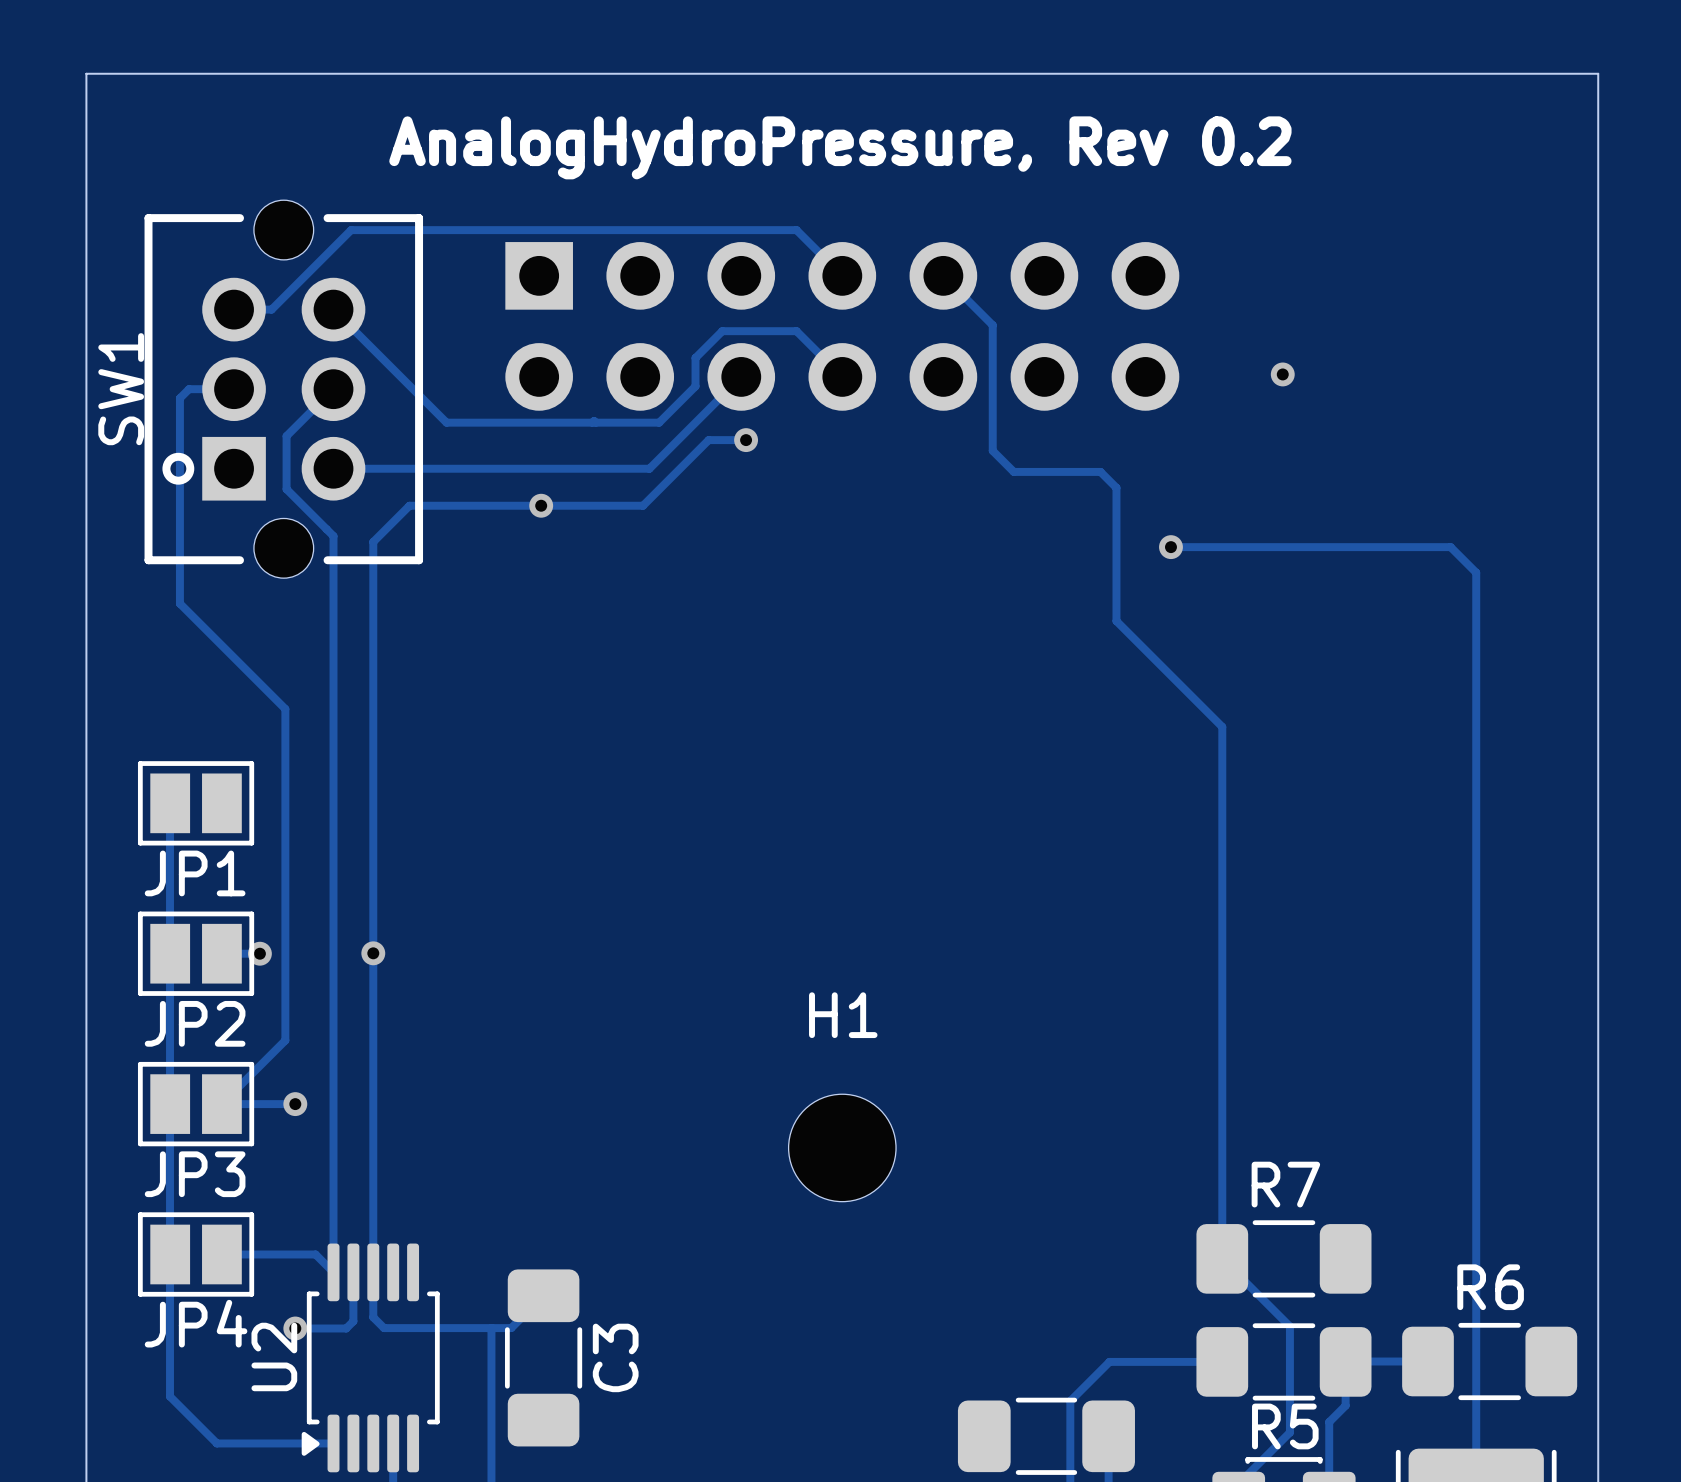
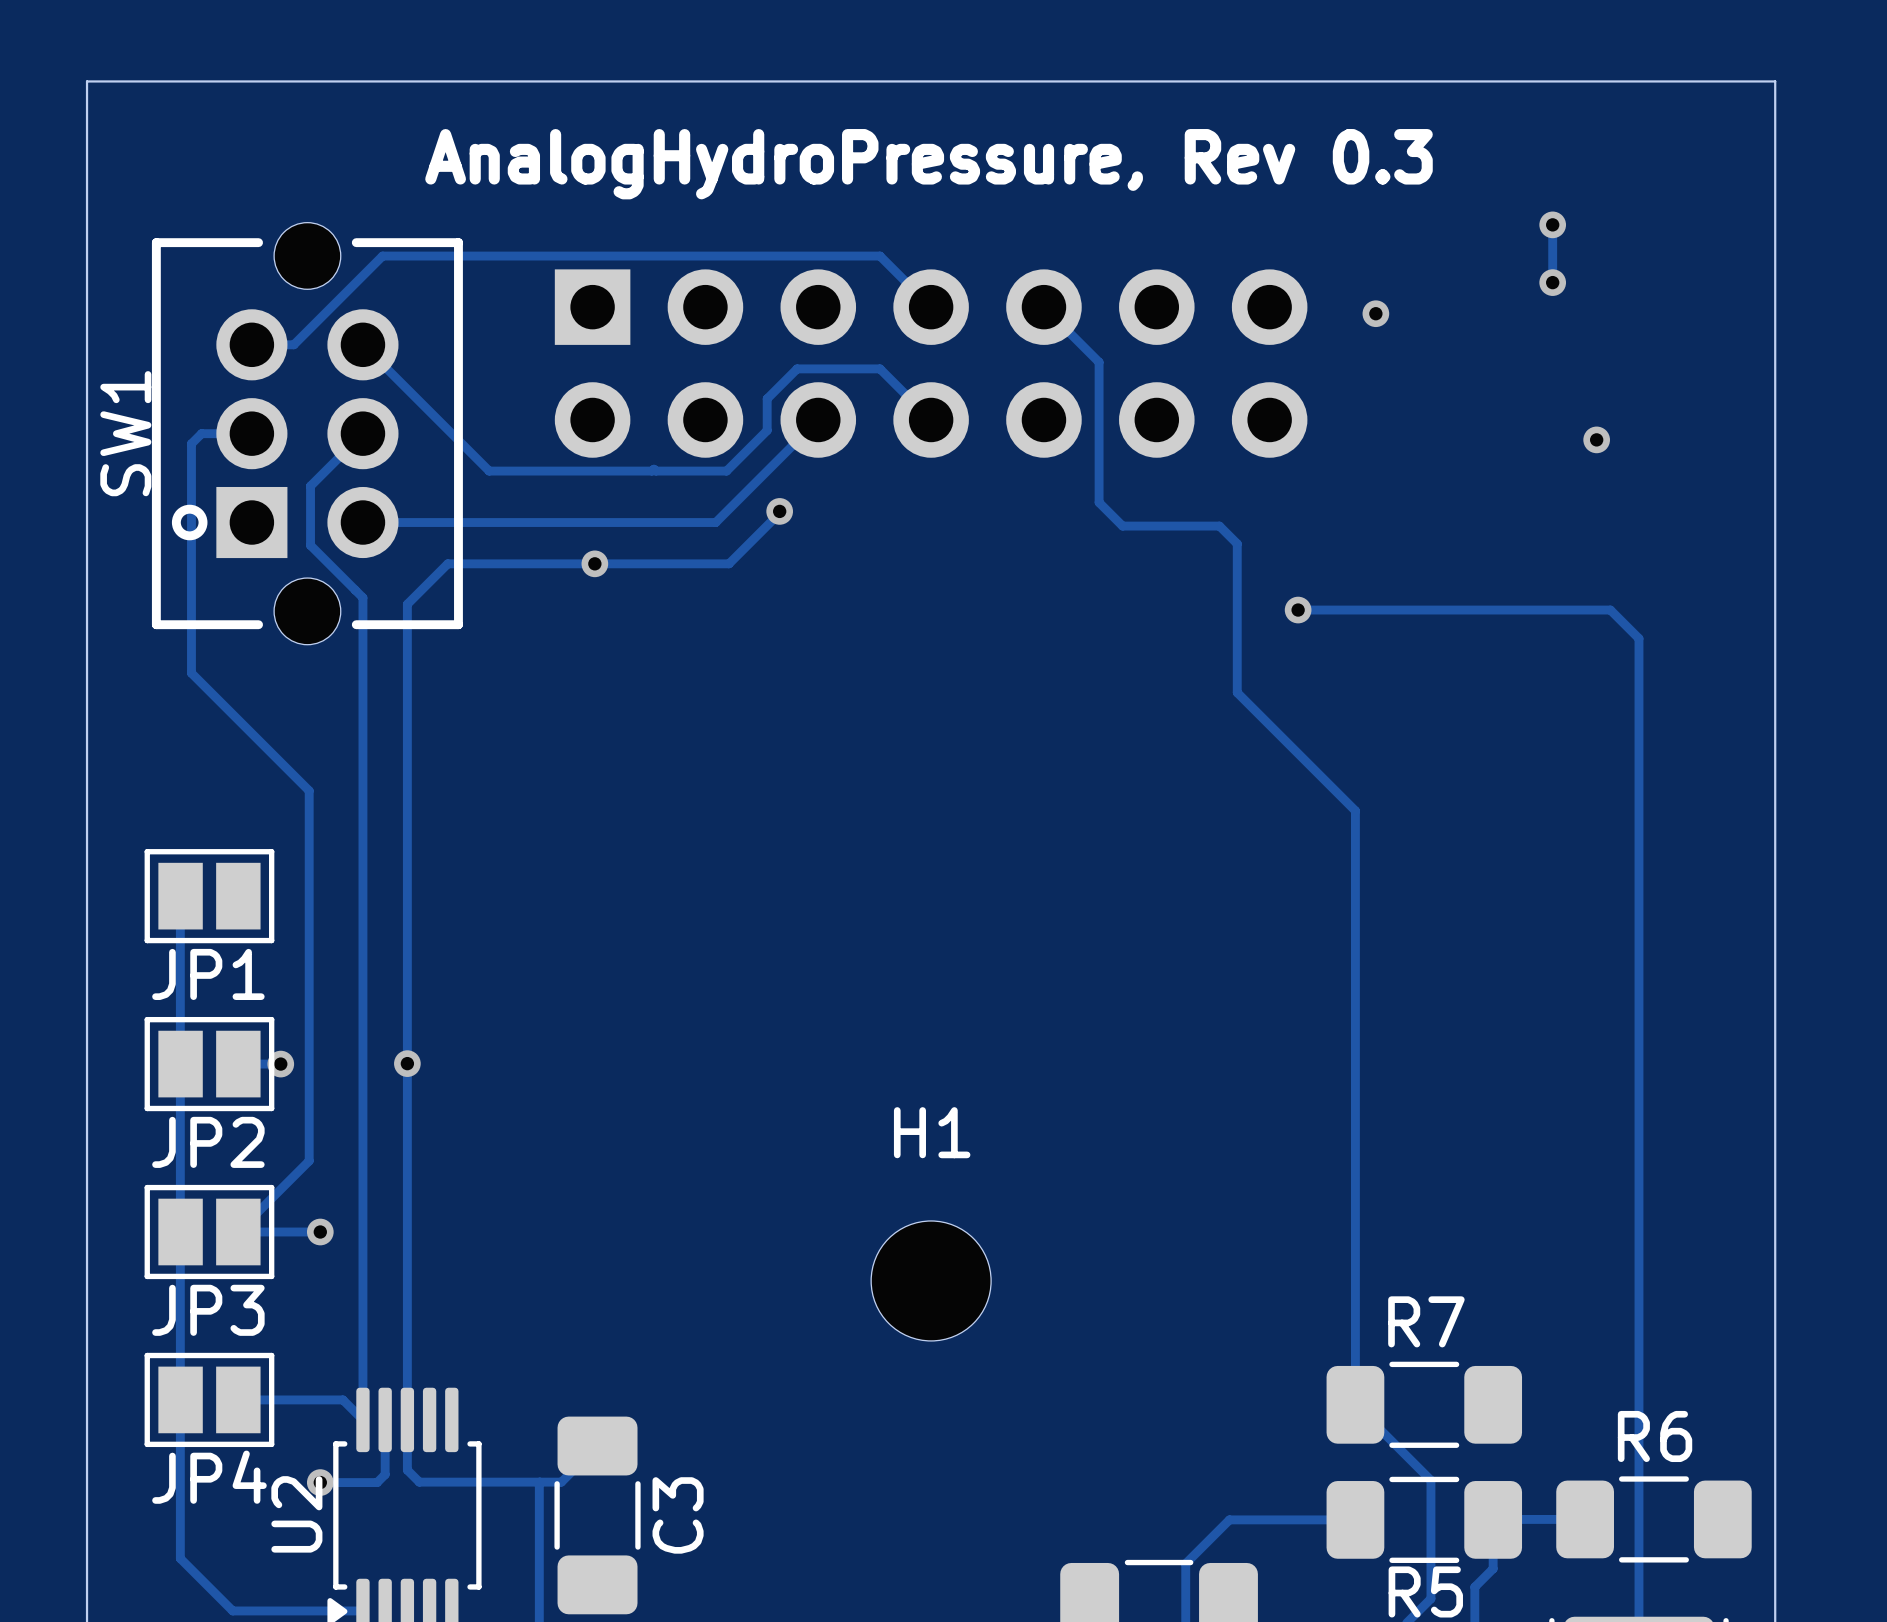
text: AnalogHydroPressure, Rev 0.2 (840, 147) -> AnalogHydroPressure, Rev 0.3 (929, 164)
track: none -> (1552, 224) (1552, 282)
via: none -> (1552, 224)
via: none -> (1552, 282)
via: none -> (1375, 313)
via: (1282, 374) -> none
via: none -> (1596, 439)
track: (746, 440) (708, 440) (643, 505) -> (781, 511) (729, 563) (708, 563)
via position: (746, 440) -> (779, 511)

